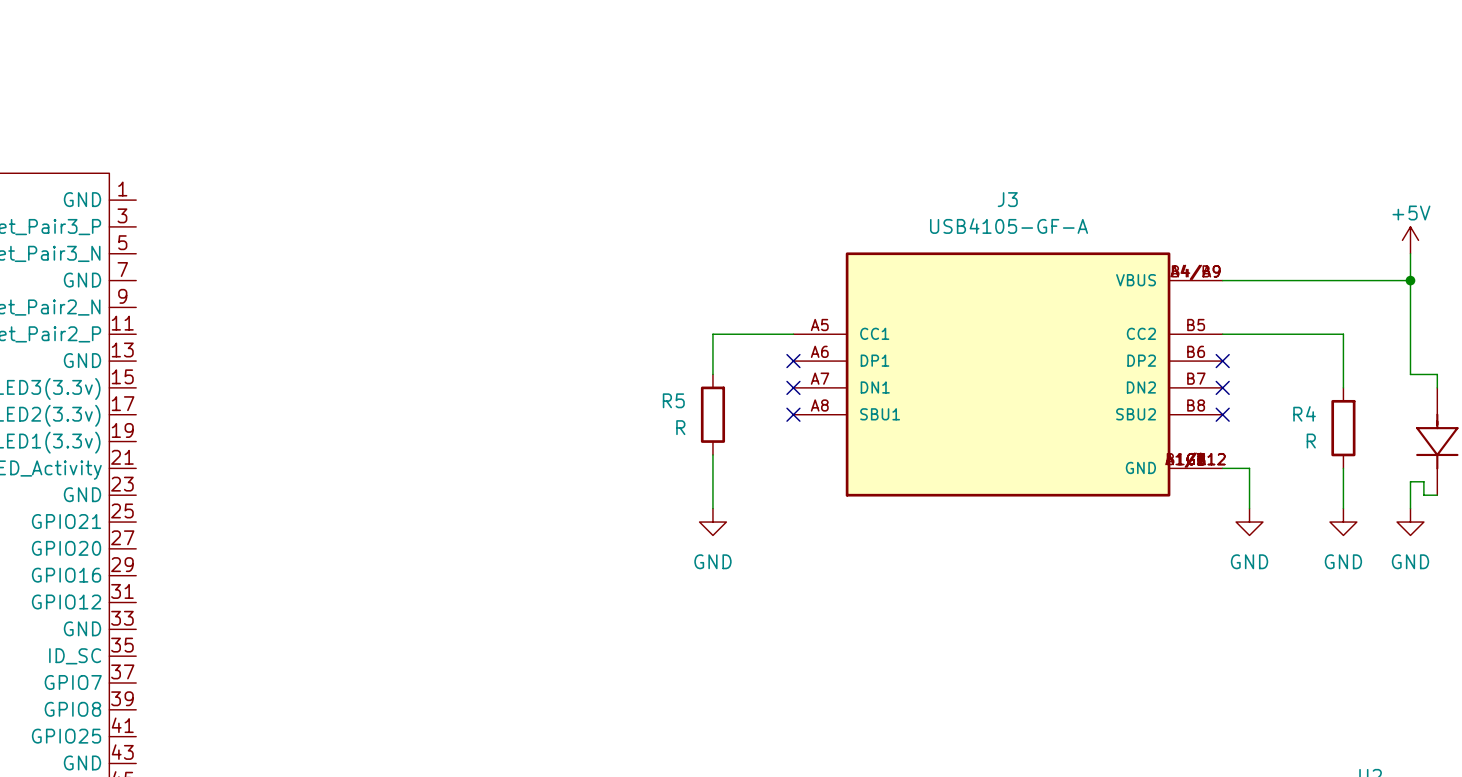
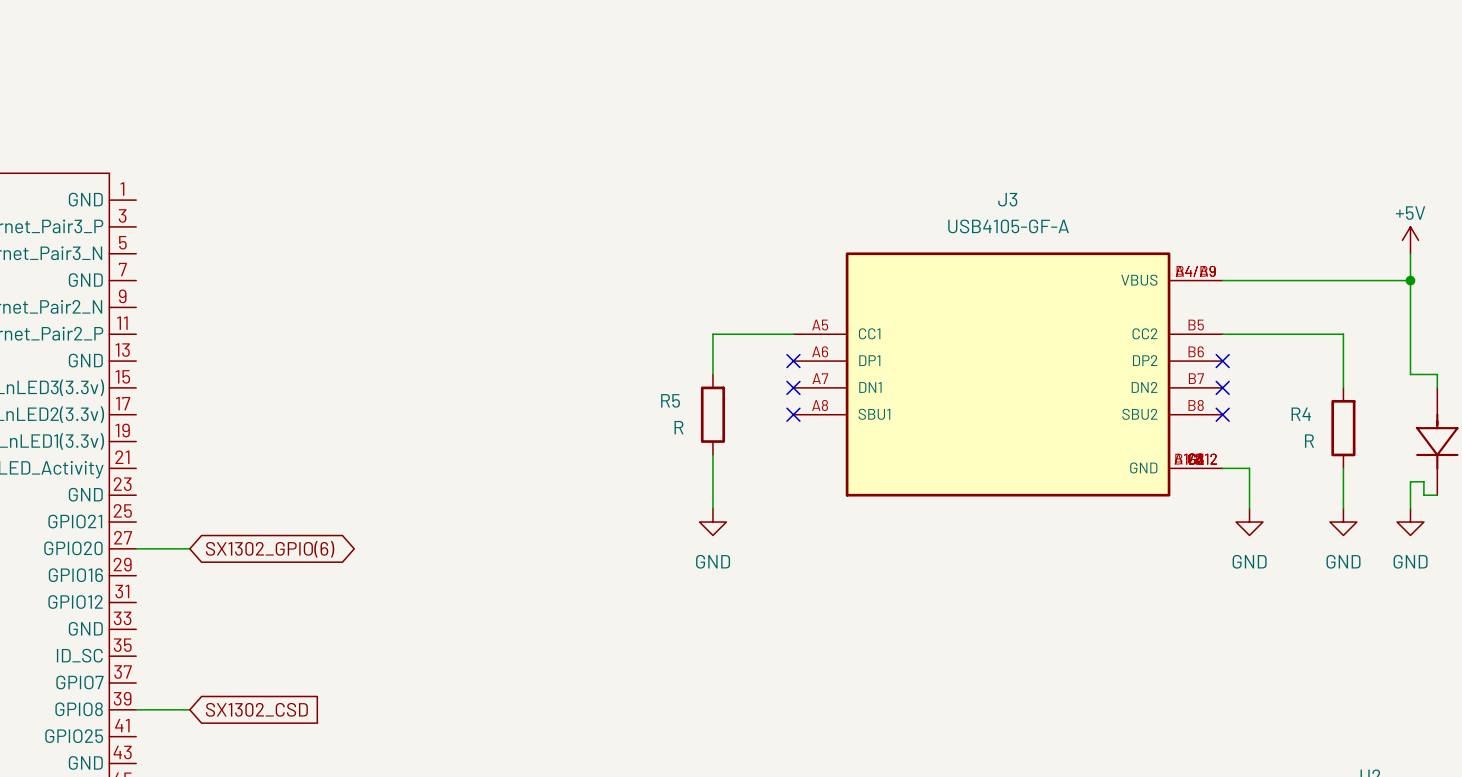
wire: none -> (136, 548) (189, 548)
global label: none -> SX1302_GPIO(6) (270, 549)
wire: none -> (136, 709) (189, 709)
global label: none -> SX1302_CSD (256, 709)

